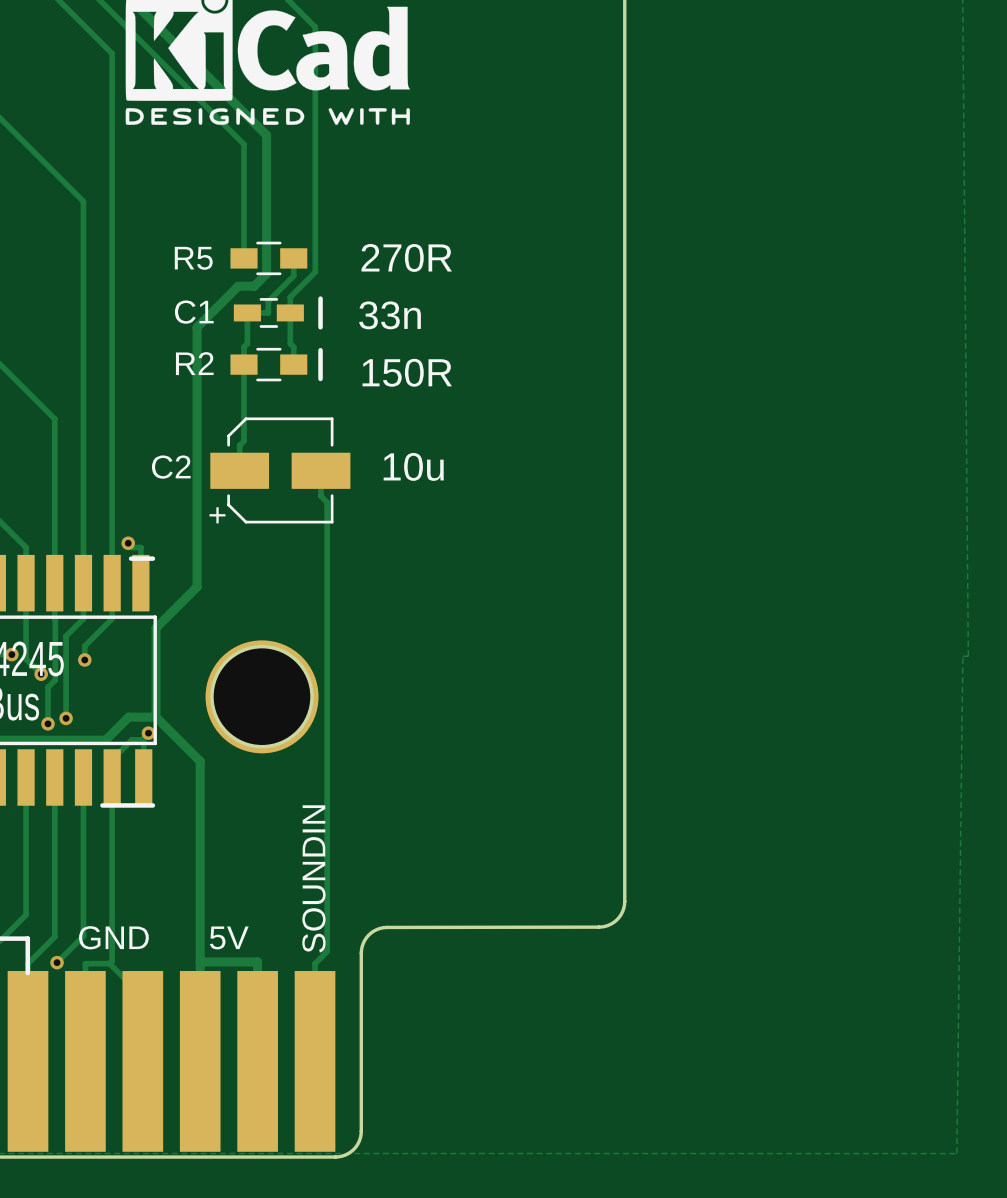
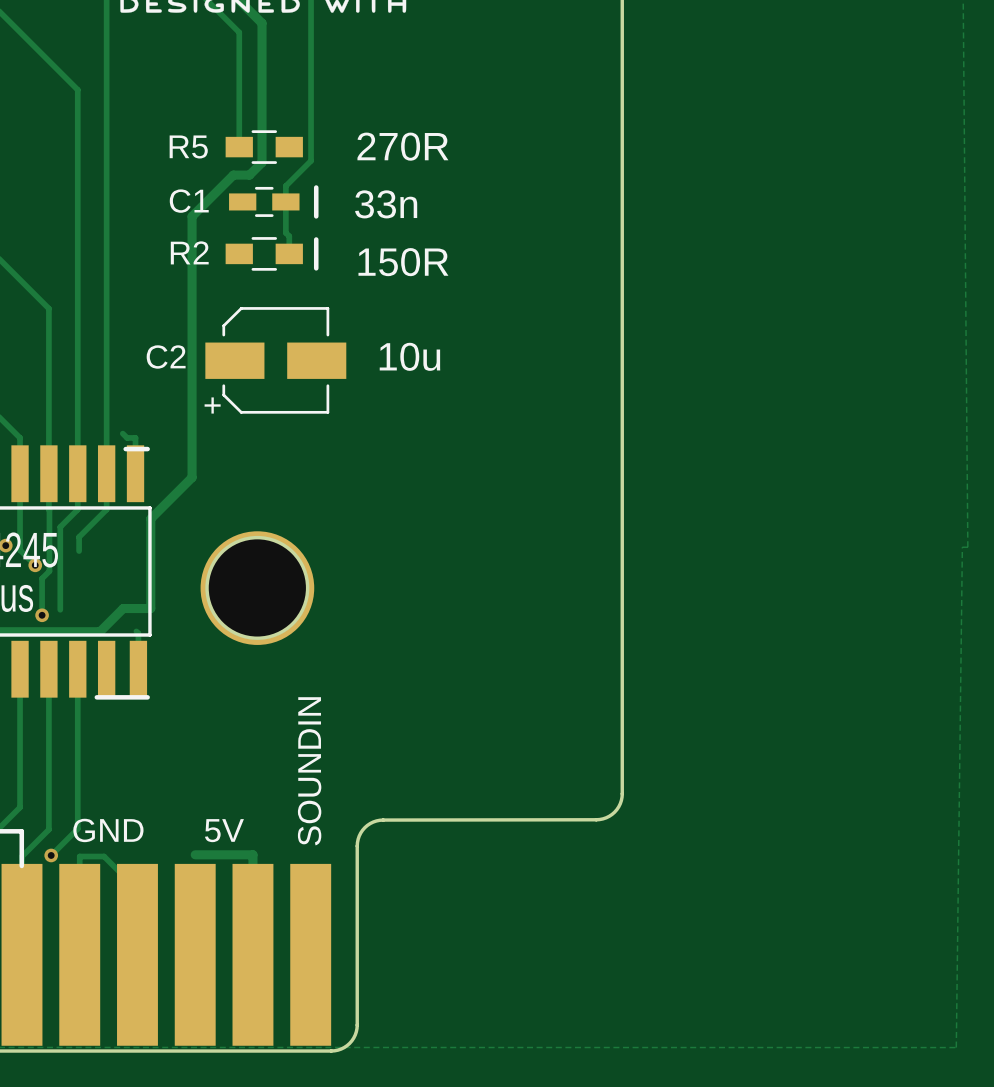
track: (293, 258) (293, 275) (268, 301) (268, 312) (247, 312) (247, 343) (244, 347) (244, 441) (239, 445) (239, 470) -> none
track: (321, 470) (321, 496) (327, 502) (327, 951) (315, 963) (315, 1061) -> none
via: (128, 543) -> none
via: (84, 659) -> none
track: (156, 717) (200, 761) (200, 1061) -> none
via: (66, 718) -> none
track: (148, 733) (141, 739) (131, 739) (112, 759) (112, 961) (109, 963) -> none
via: (148, 733) -> none

